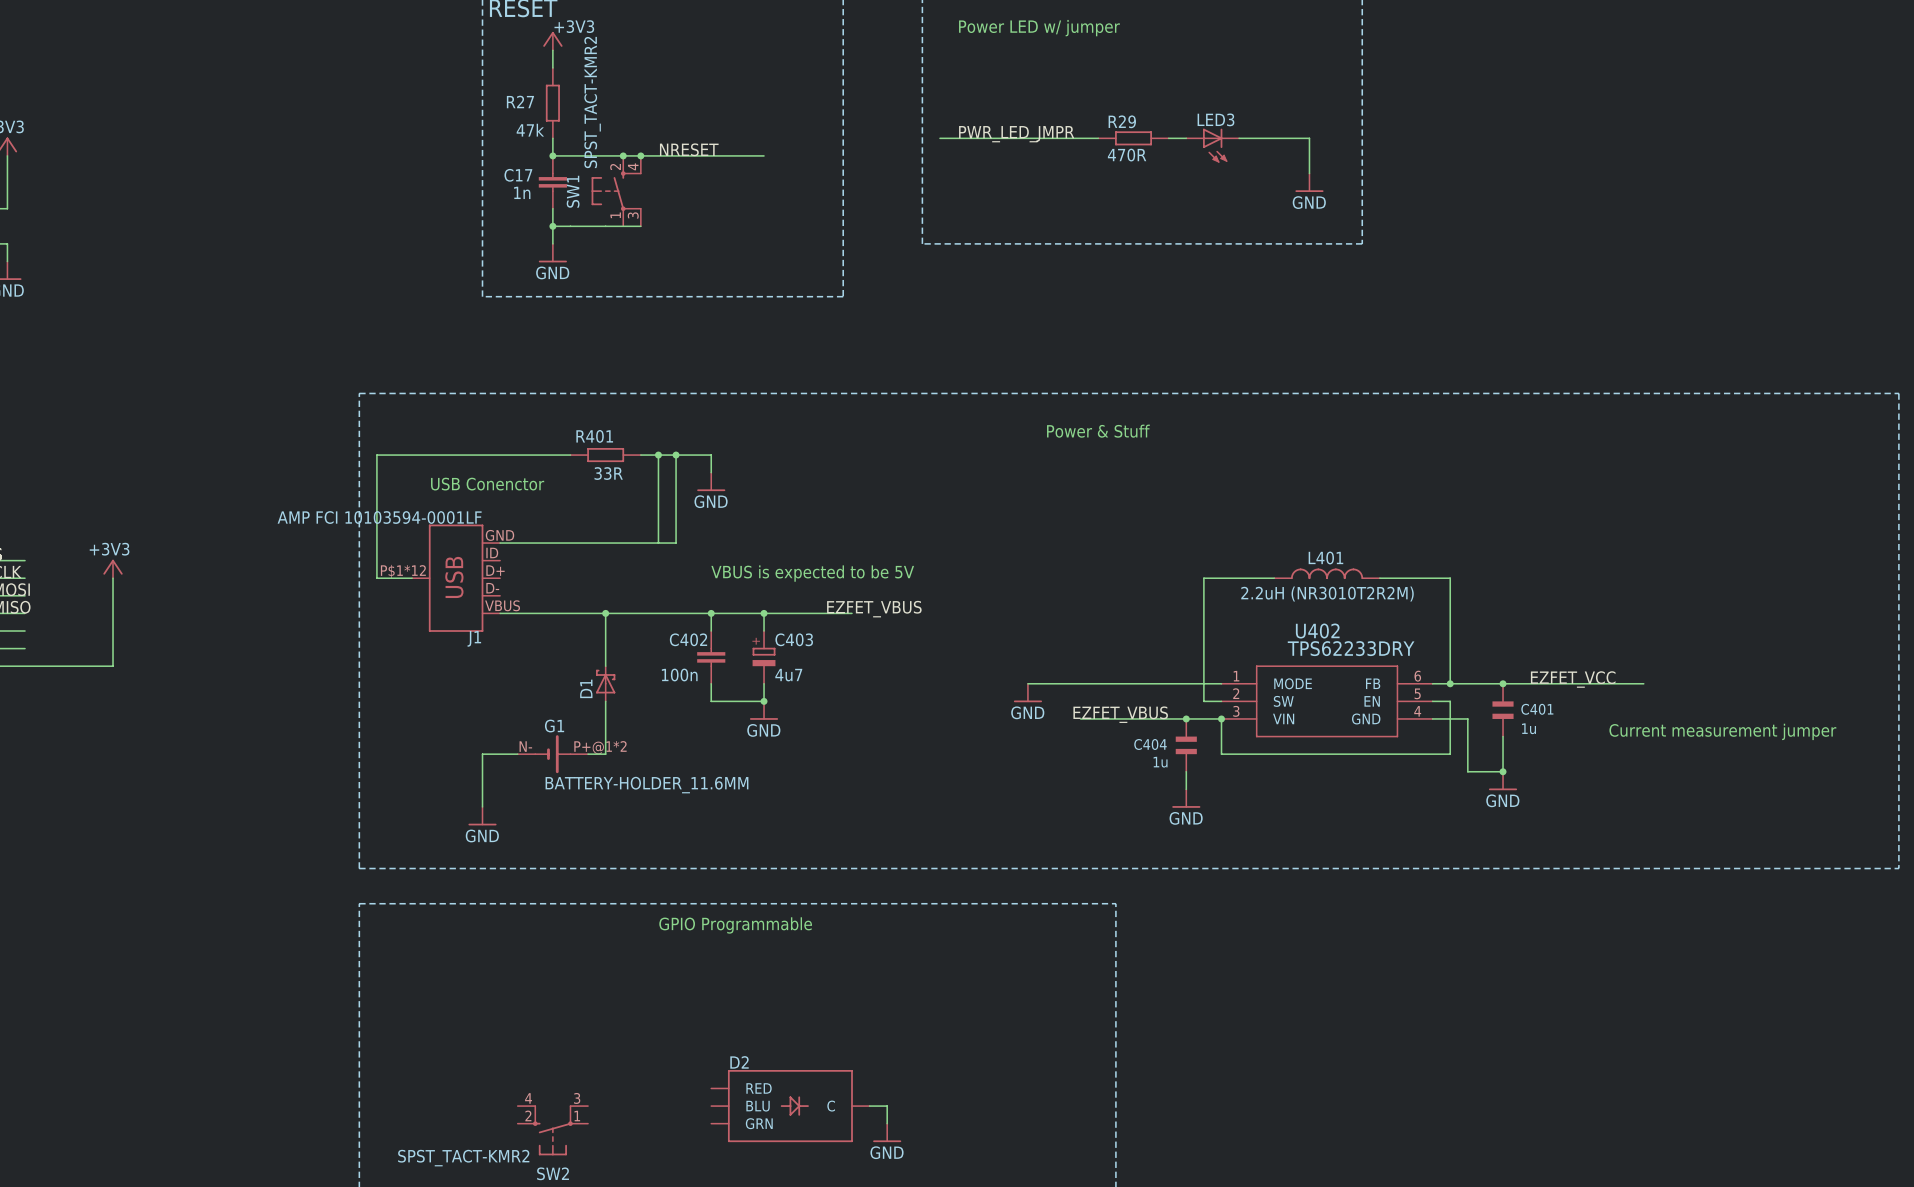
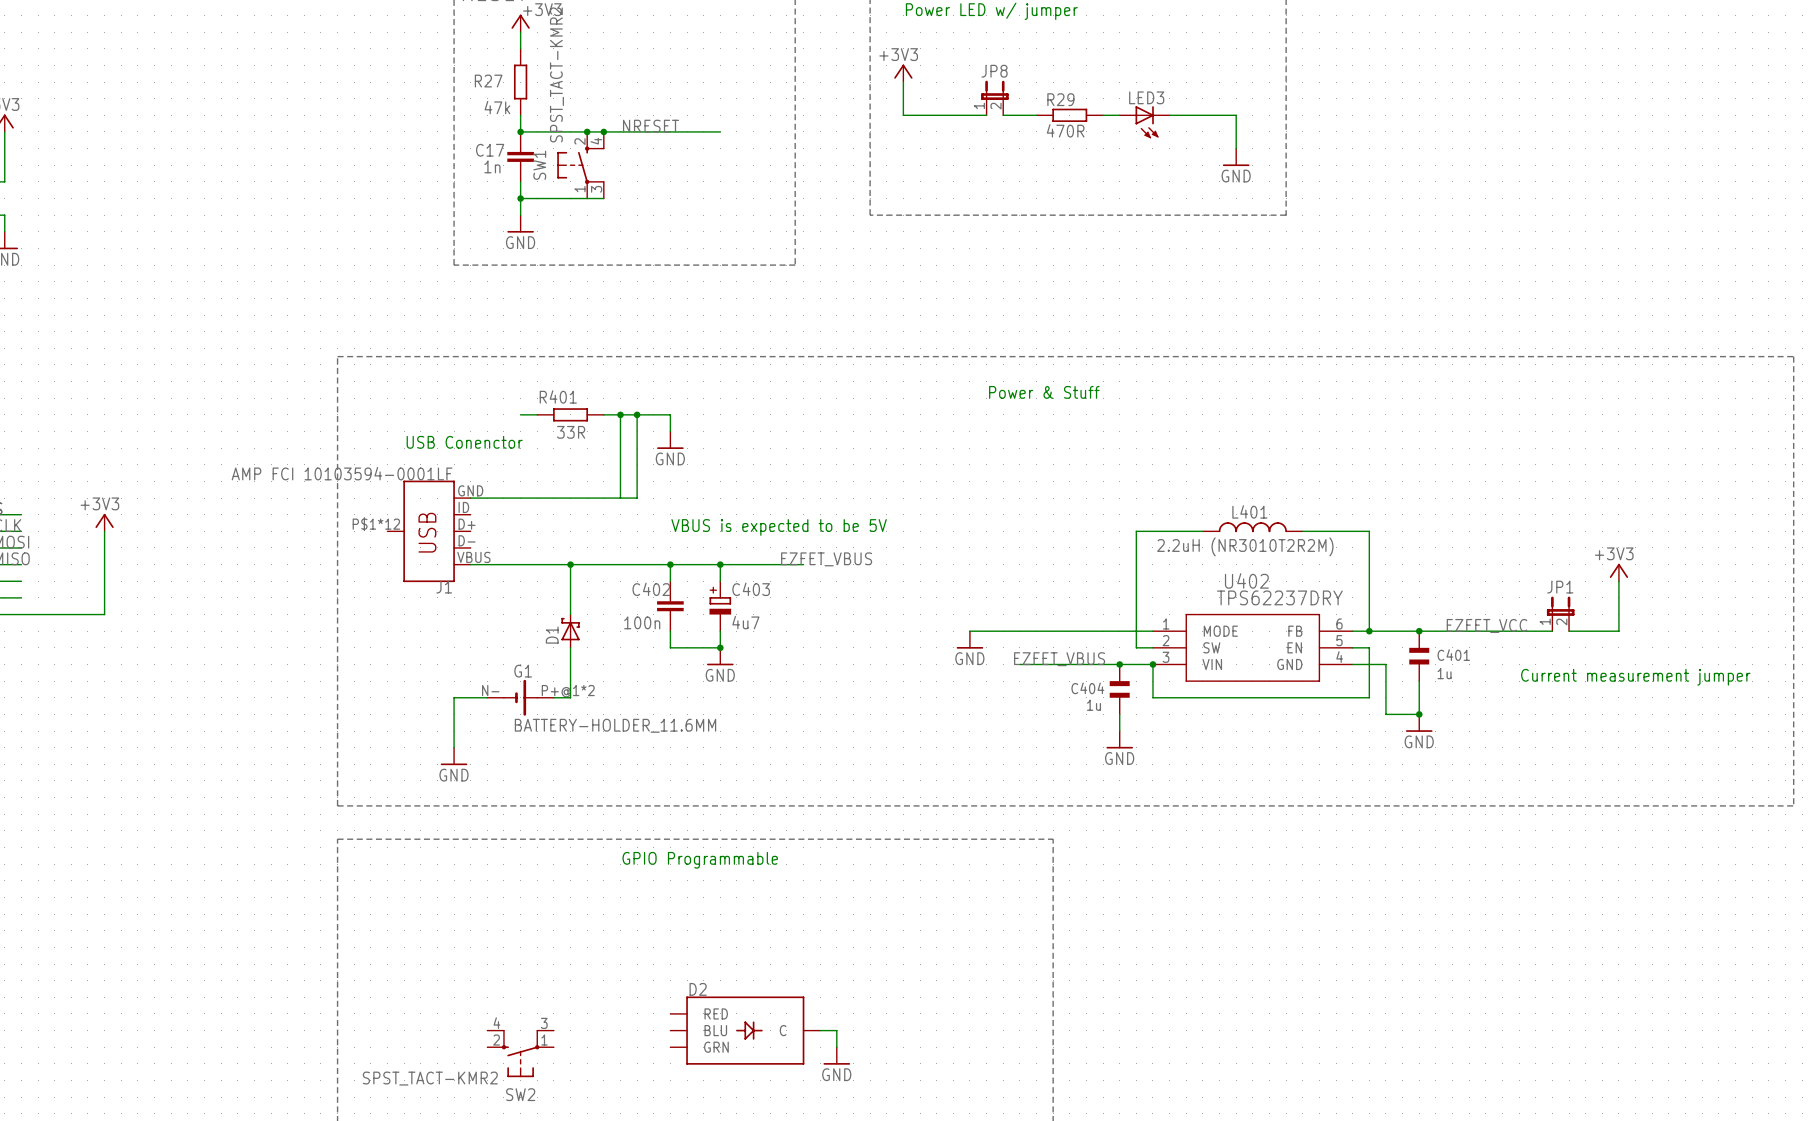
power symbol: none -> +3V3 (903, 73)
JP8: none -> (994, 98)
label: PWR_LED_JMPR (1016, 134) -> none
wire: (939, 138) (957, 138) -> (903, 82) (903, 115)
wire: (1045, 138) (1063, 138) -> none
wire: (552, 455) (376, 455) (376, 578) (412, 578) -> none
power symbol: none -> +3V3 (1618, 572)
wire: none -> (1618, 581) (1618, 631) (1569, 631)
U402 value: TPS62233DRY (1351, 648) -> TPS62237DRY (1279, 597)
JP1: none -> (1560, 613)

